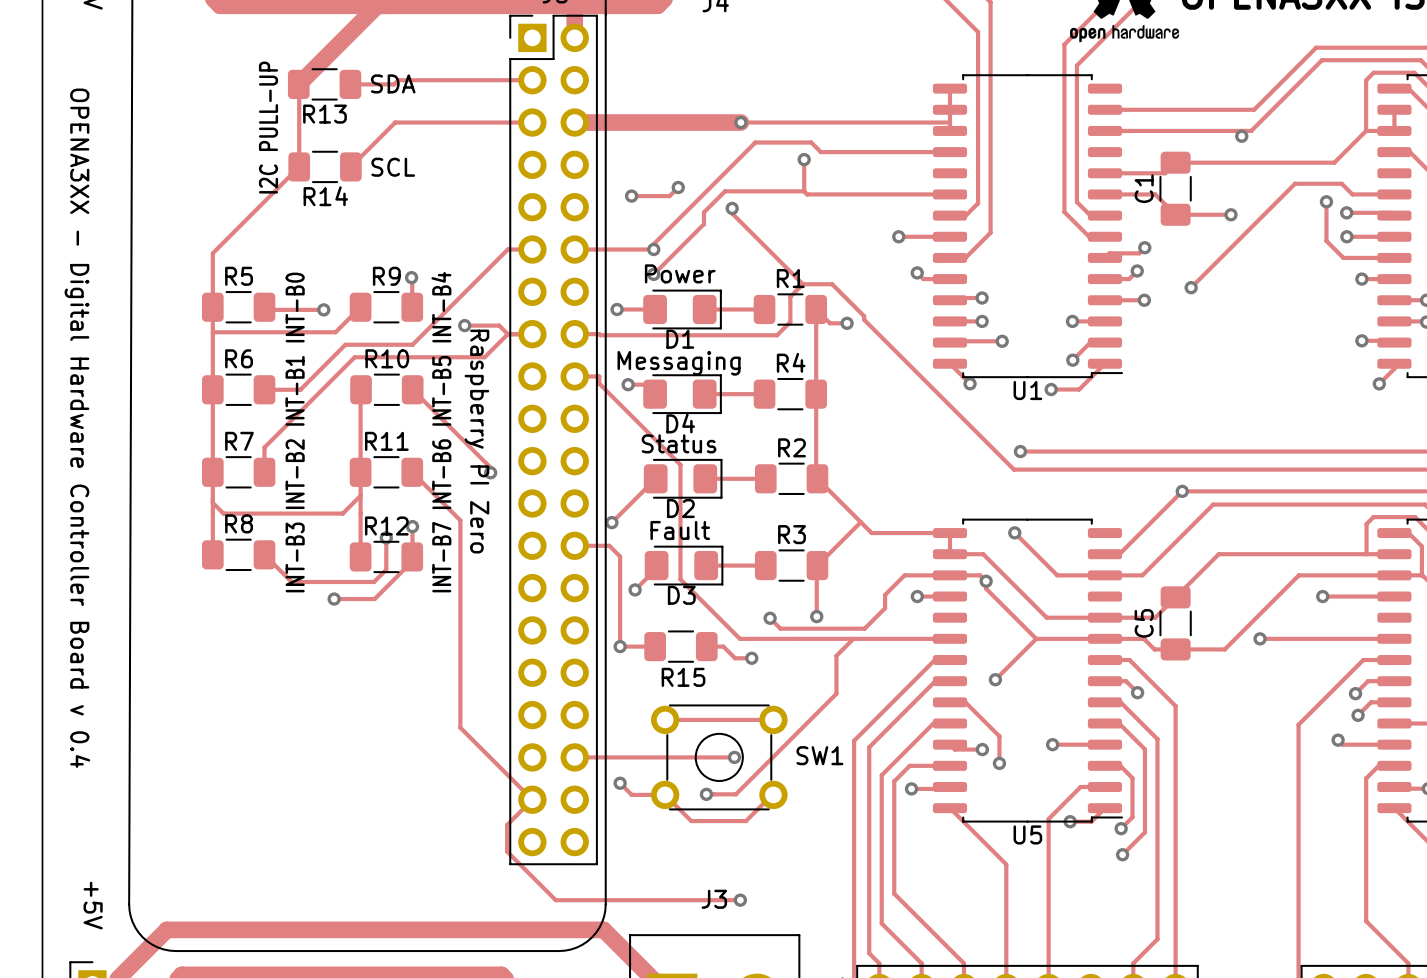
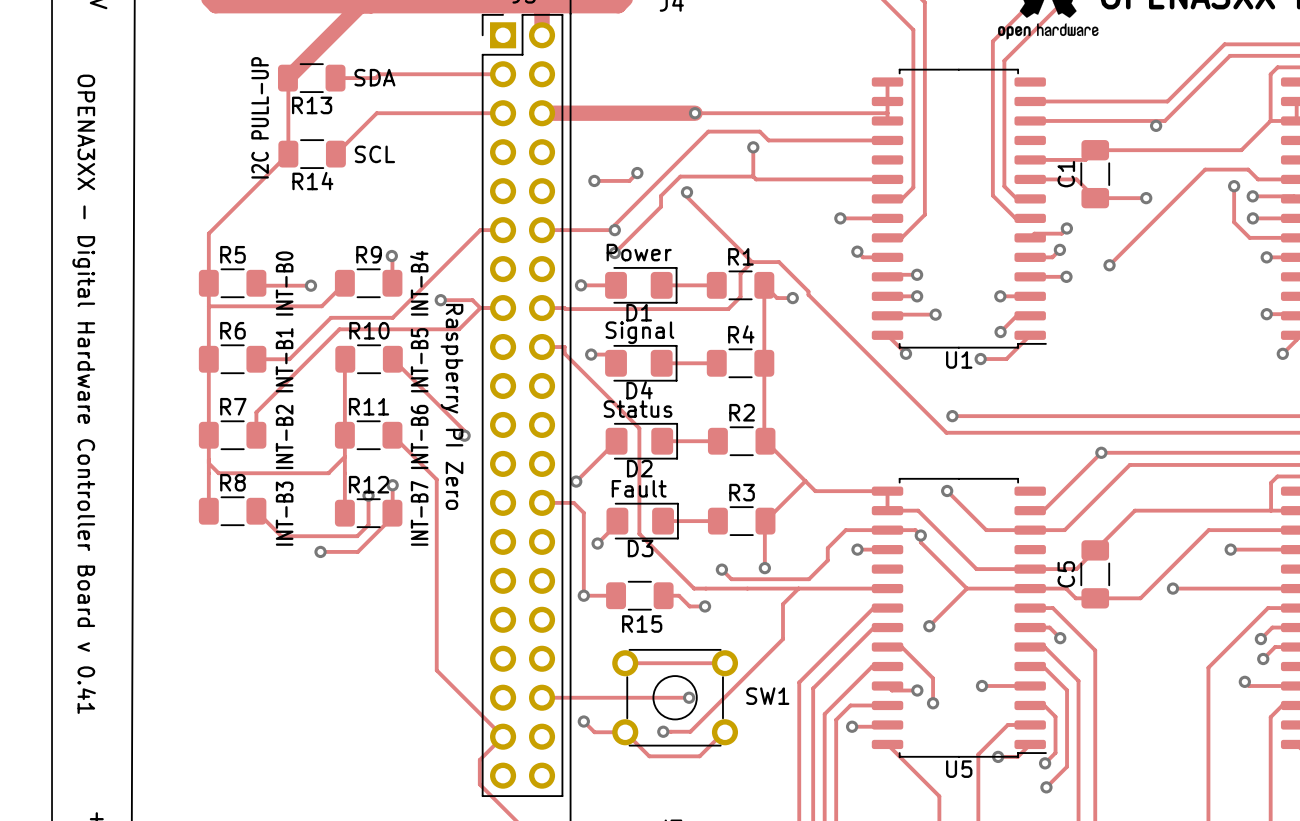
text: Messaging (679, 363) -> Signal (639, 332)
text: OPENA3XX - Digital Hardware Controller Board v 0.4 (77, 428) -> OPENA3XX - Digital Hardware Controller Board v 0.41 (84, 394)

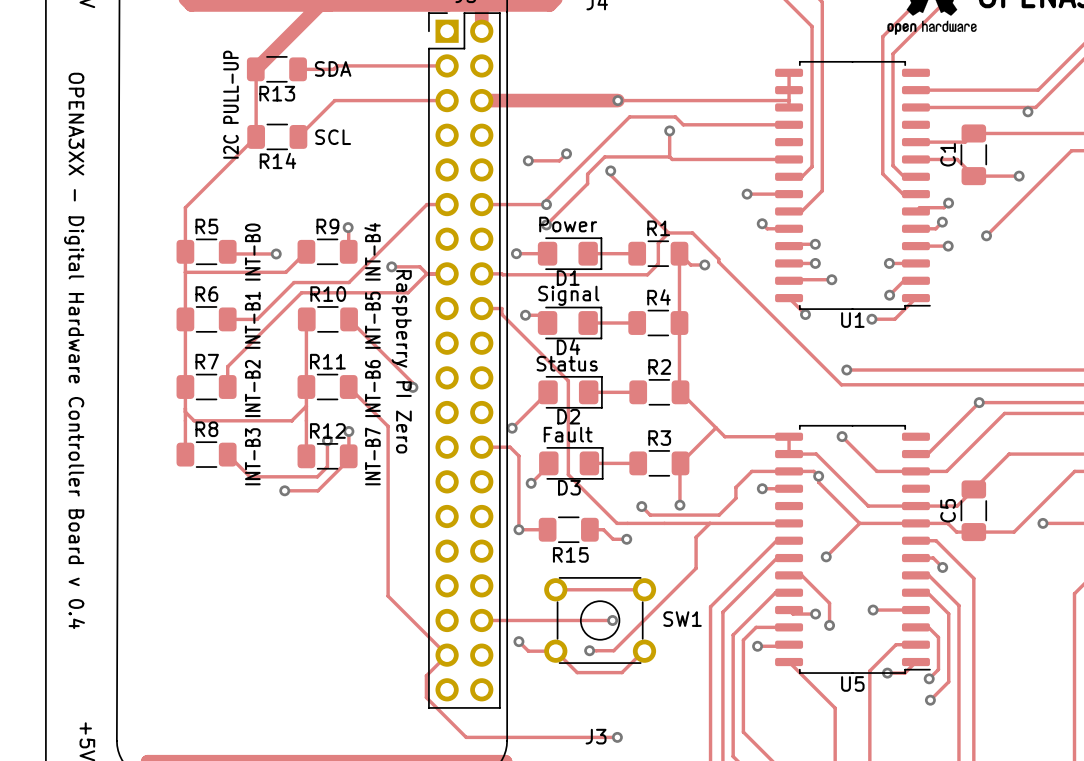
text: OPENA3XX - Digital Hardware Controller Board v 0.41 (84, 394) -> OPENA3XX - Digital Hardware Controller Board v 0.4 (74, 350)

